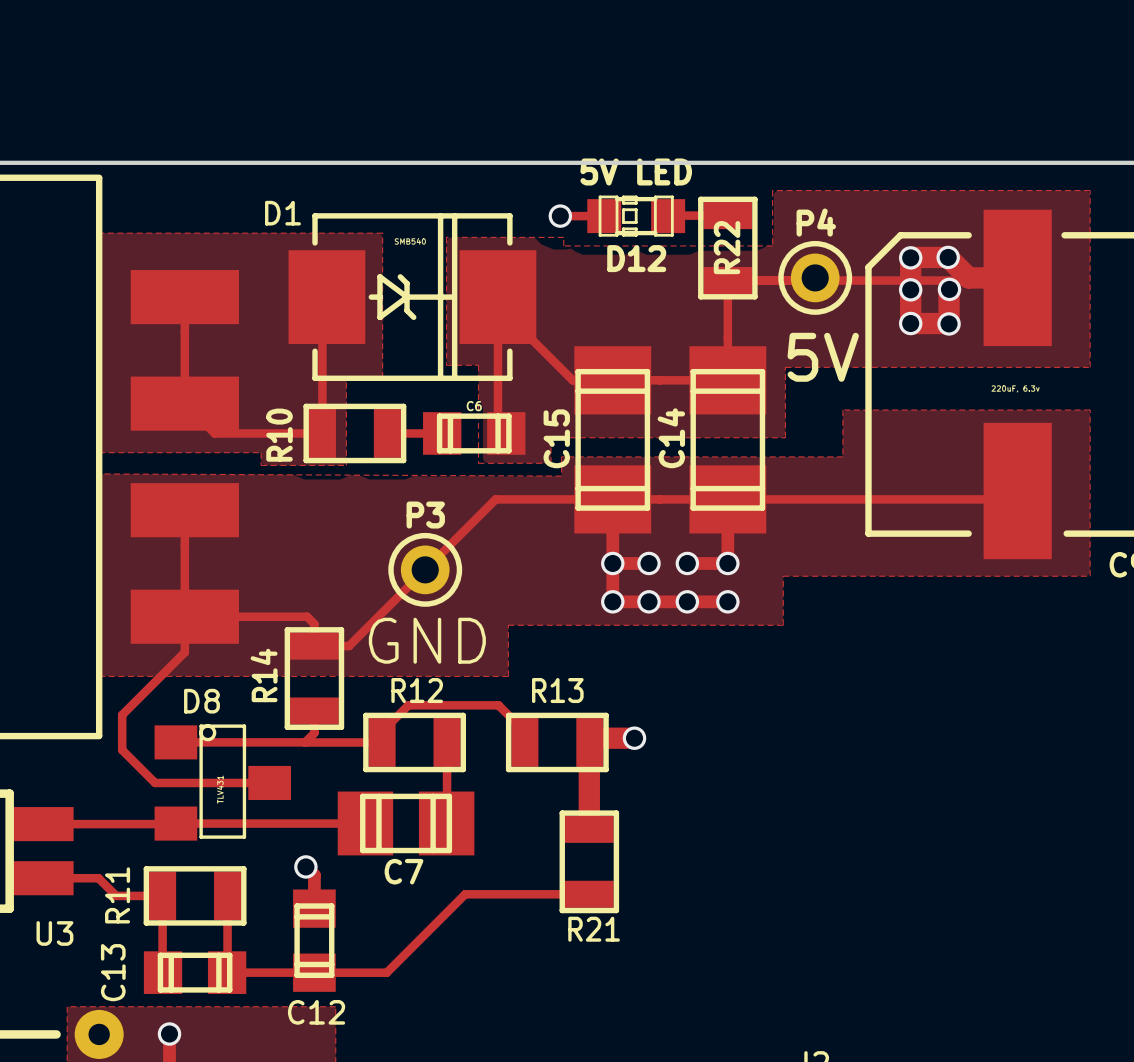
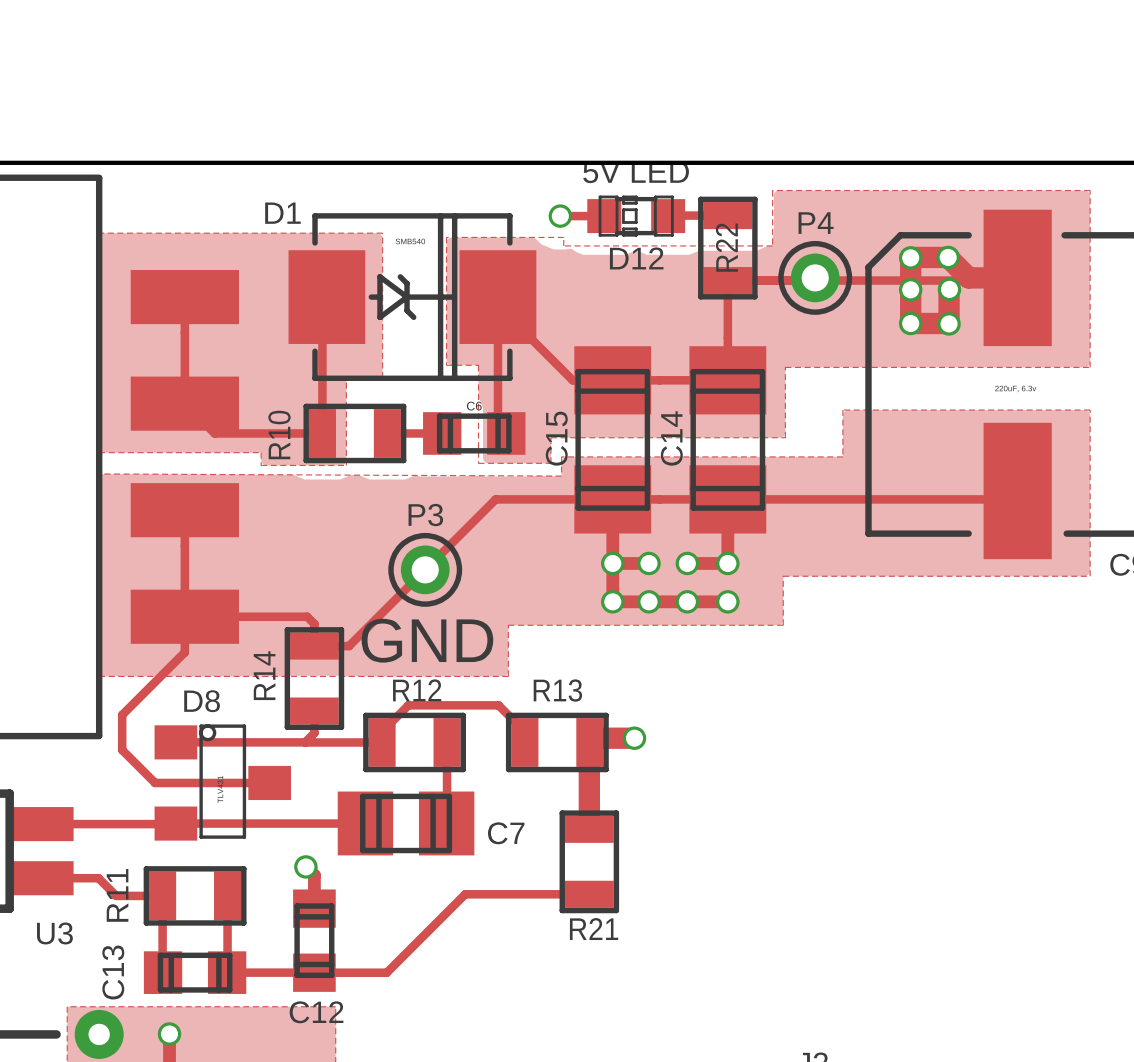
text: 5V (823, 357) -> none
C7 name position: C7 (404, 871) -> C7 (506, 833)

